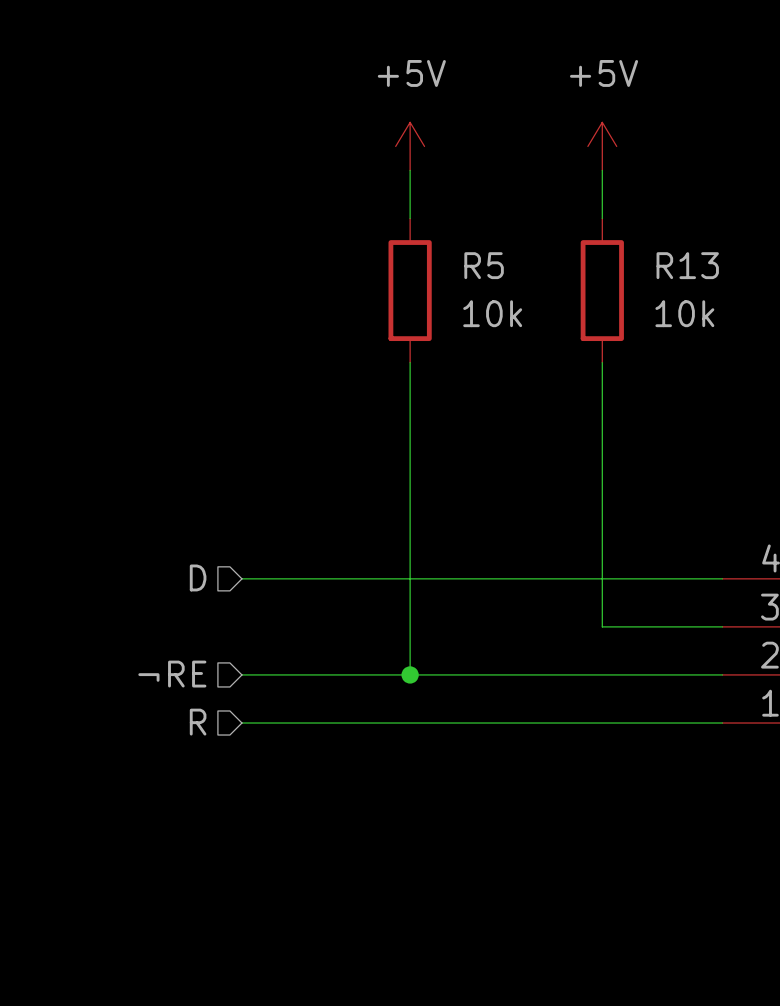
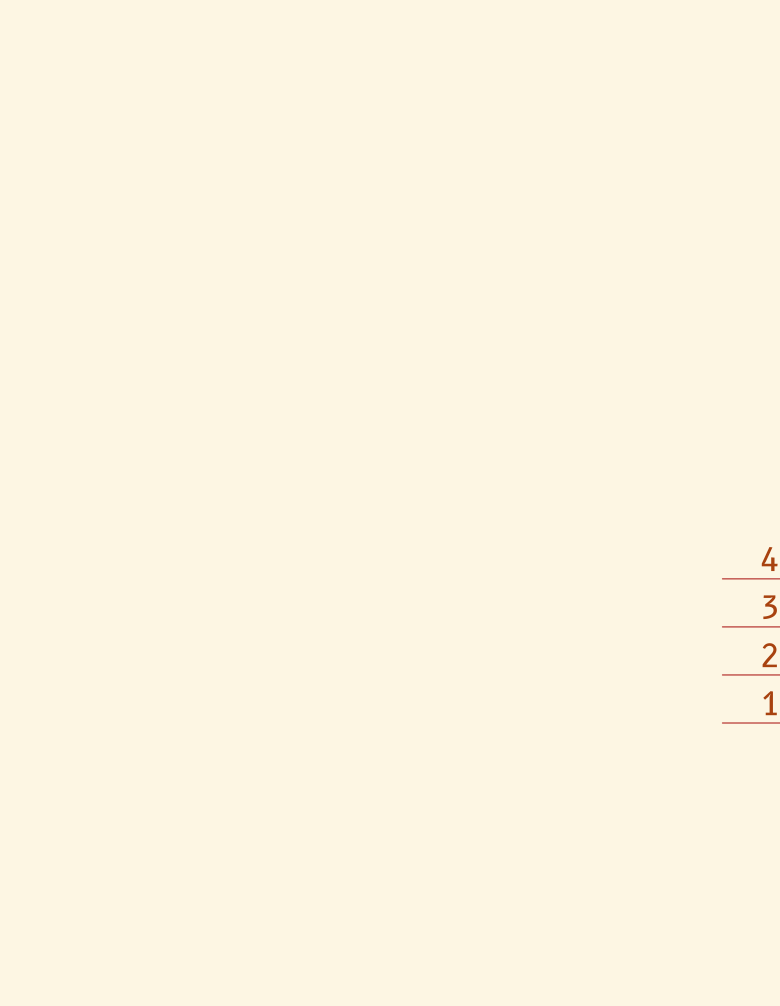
power symbol: +5V (410, 146) -> none
power symbol: +5V (602, 146) -> none
wire: (410, 170) (410, 218) -> none
wire: (602, 170) (602, 218) -> none
R5: 10k (410, 290) -> none
R13: 10k (602, 290) -> none
wire: (410, 362) (410, 674) -> none
wire: (602, 362) (602, 626) (722, 626) -> none
hierarchical label: D (198, 577) -> none
wire: (241, 578) (722, 578) -> none
hierarchical label: ¬RE (172, 674) -> none
wire: (241, 674) (722, 674) -> none
junction: (410, 674) -> none
hierarchical label: R (198, 722) -> none
wire: (241, 723) (722, 723) -> none

